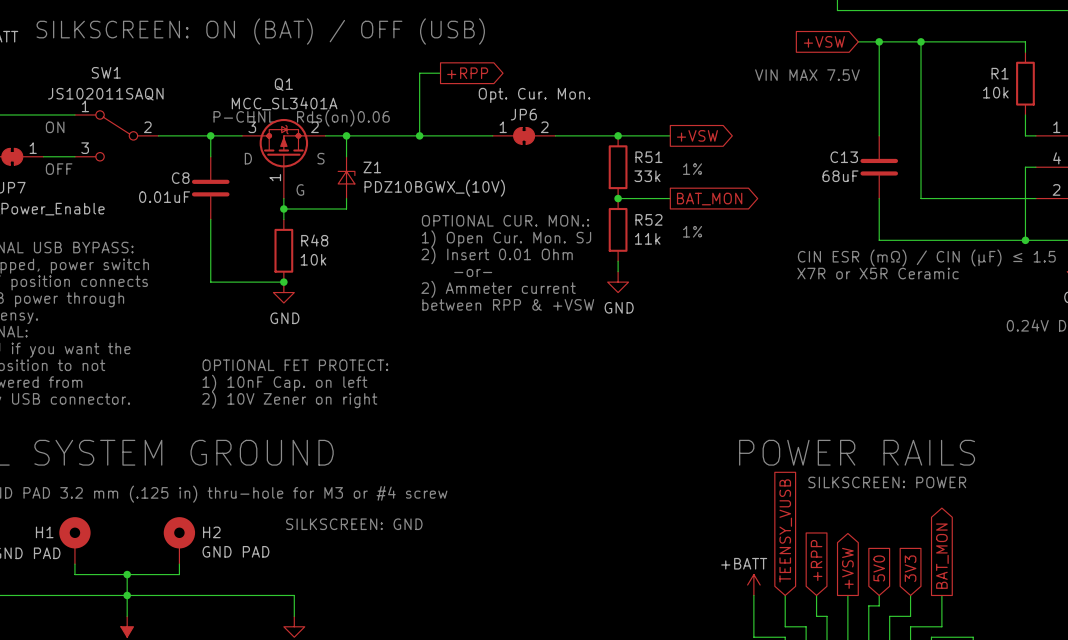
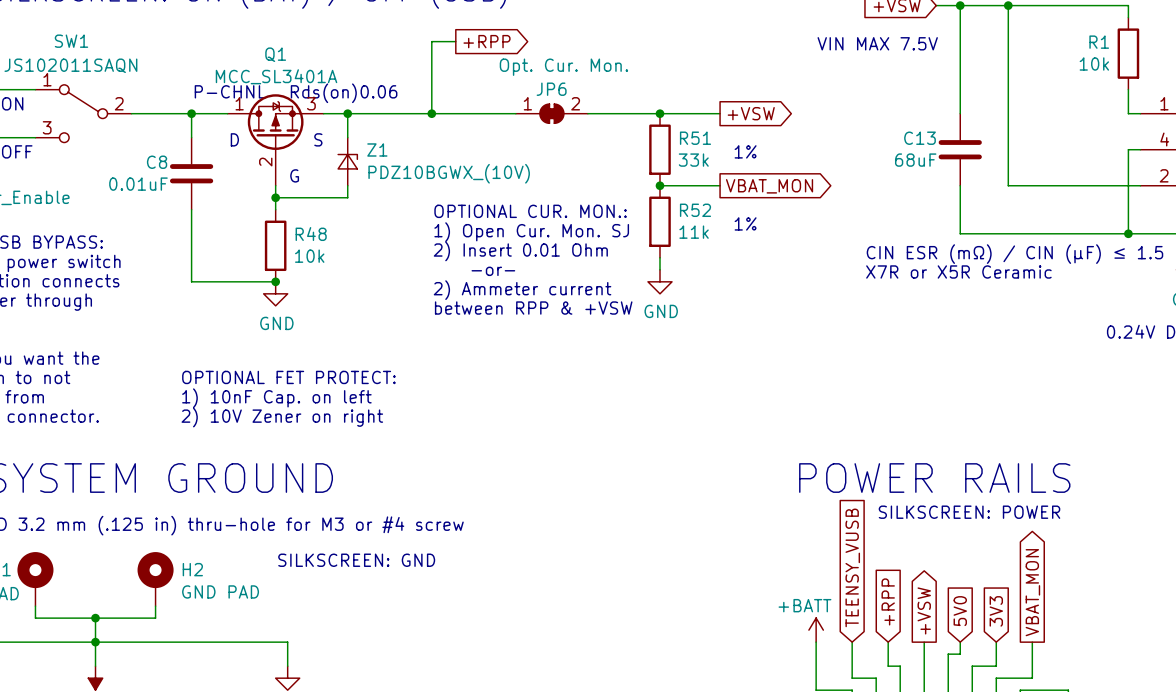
Q1 pin number: 3 (252, 127) -> 1 (239, 103)
Q1 pin number: 2 (314, 127) -> 3 (311, 103)
Q1 pin number: 1 (275, 177) -> 2 (265, 162)
global label: BAT_MON (709, 199) -> VBAT_MON (769, 186)
global label: BAT_MON (942, 556) -> VBAT_MON (1032, 592)

